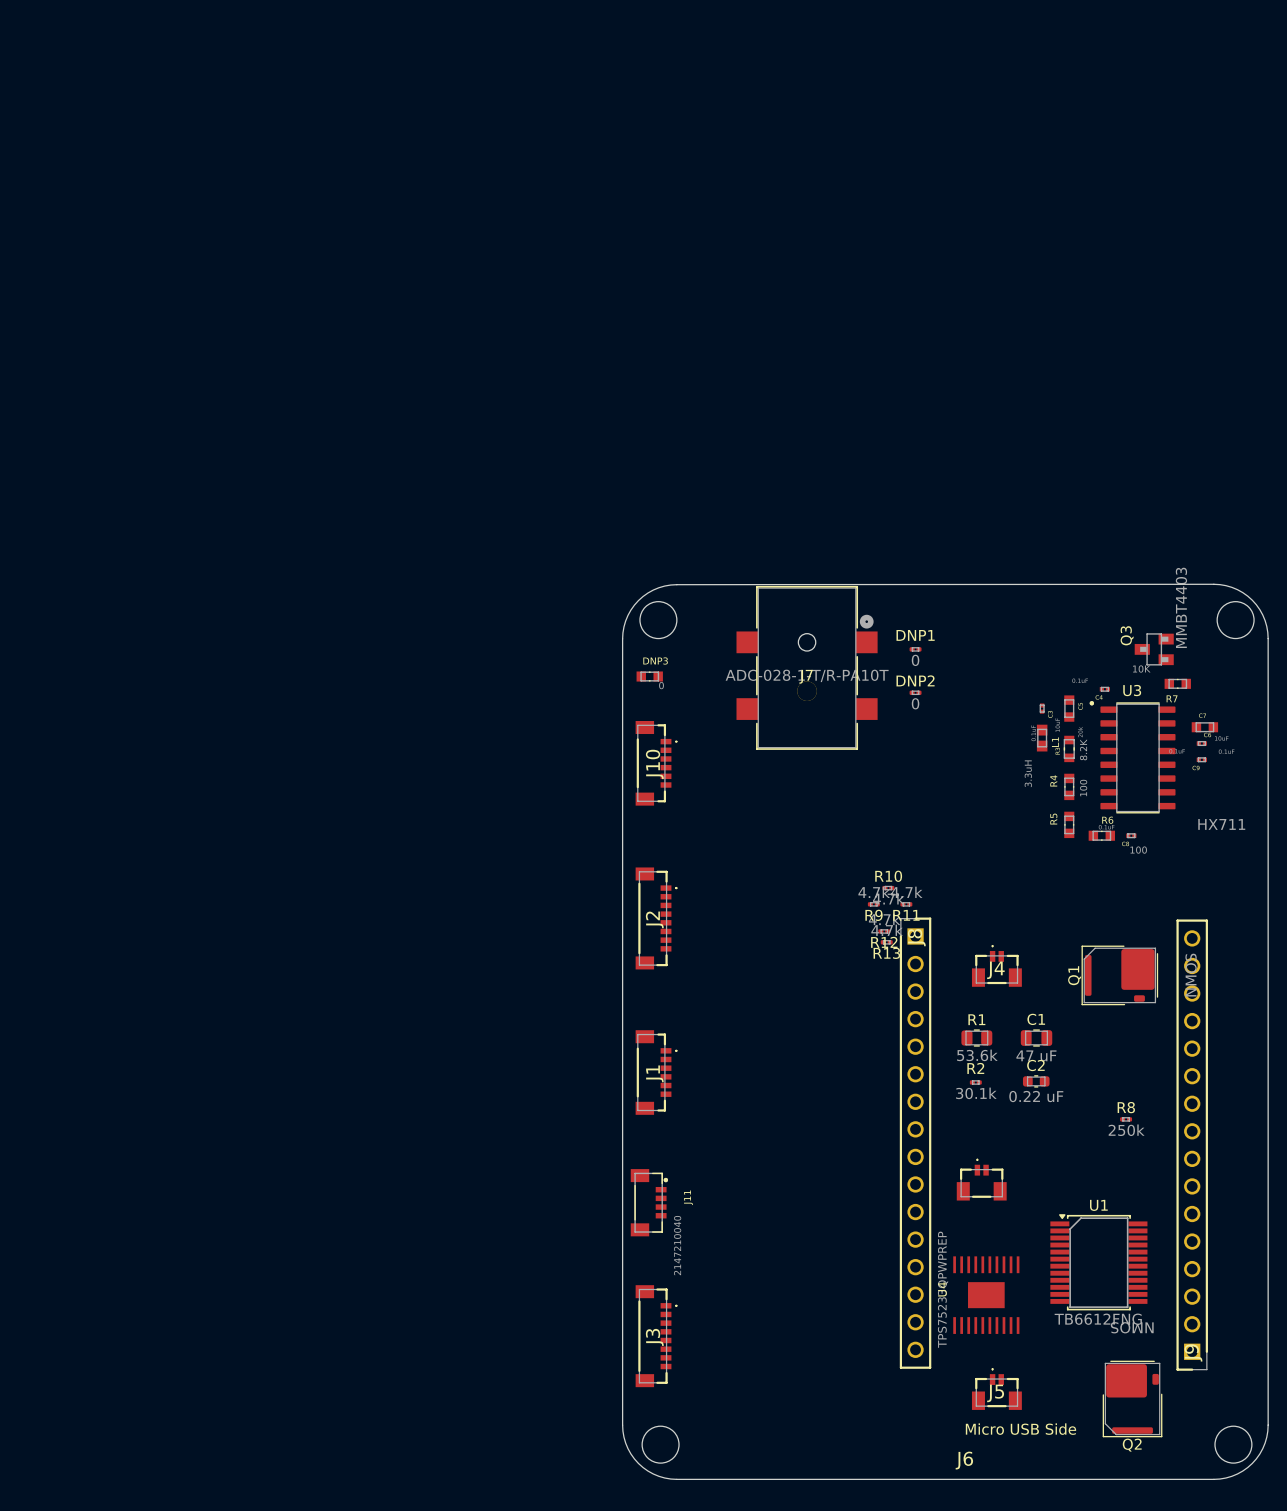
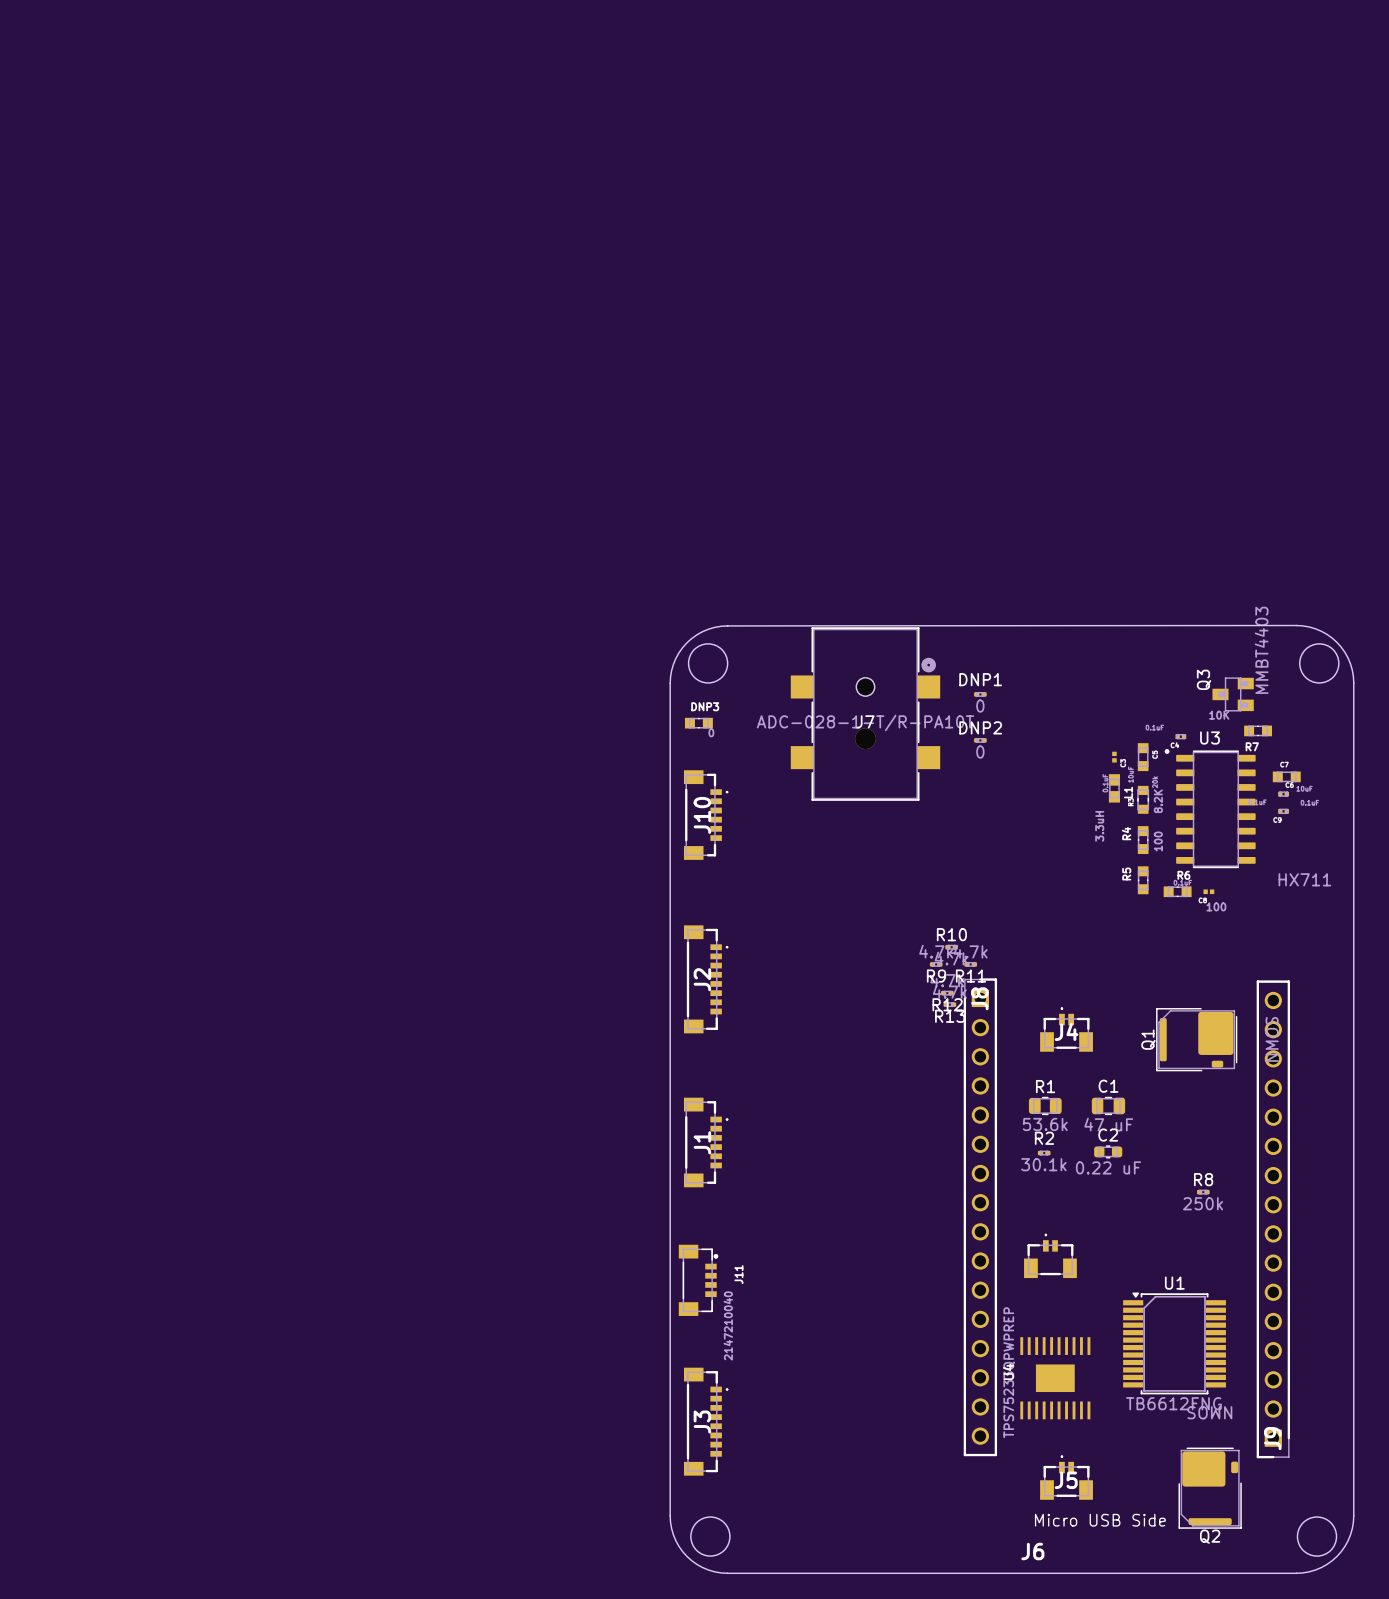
part footprint: [1039, 703, 1045, 714] -> [1112, 751, 1117, 763]
part footprint: [1126, 833, 1137, 839] -> [1203, 889, 1215, 895]

